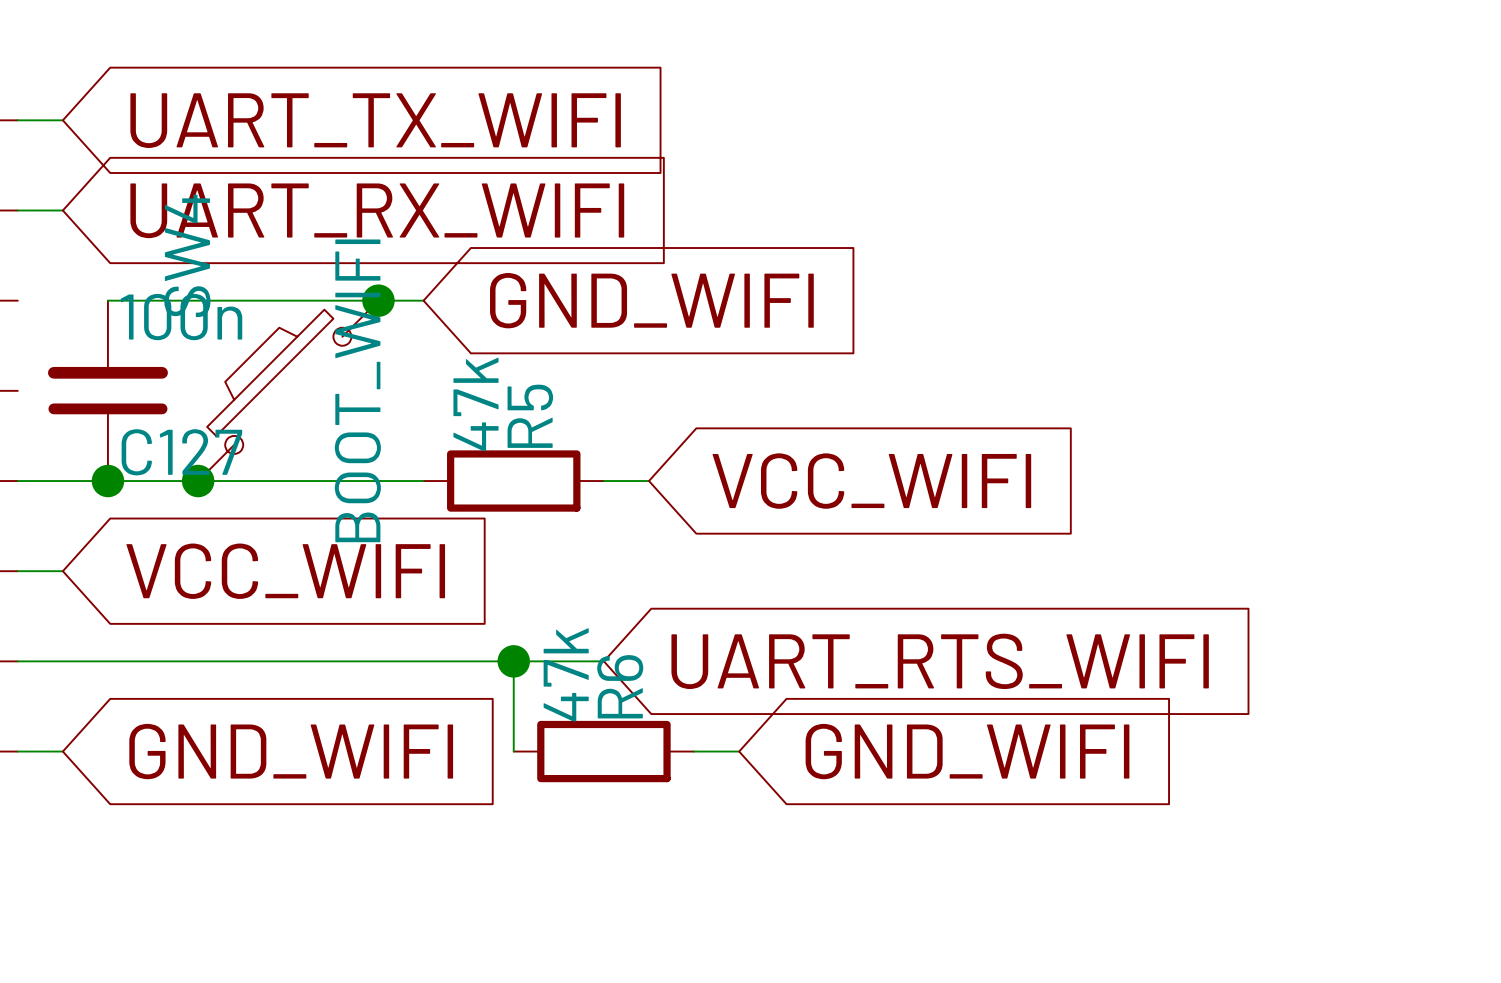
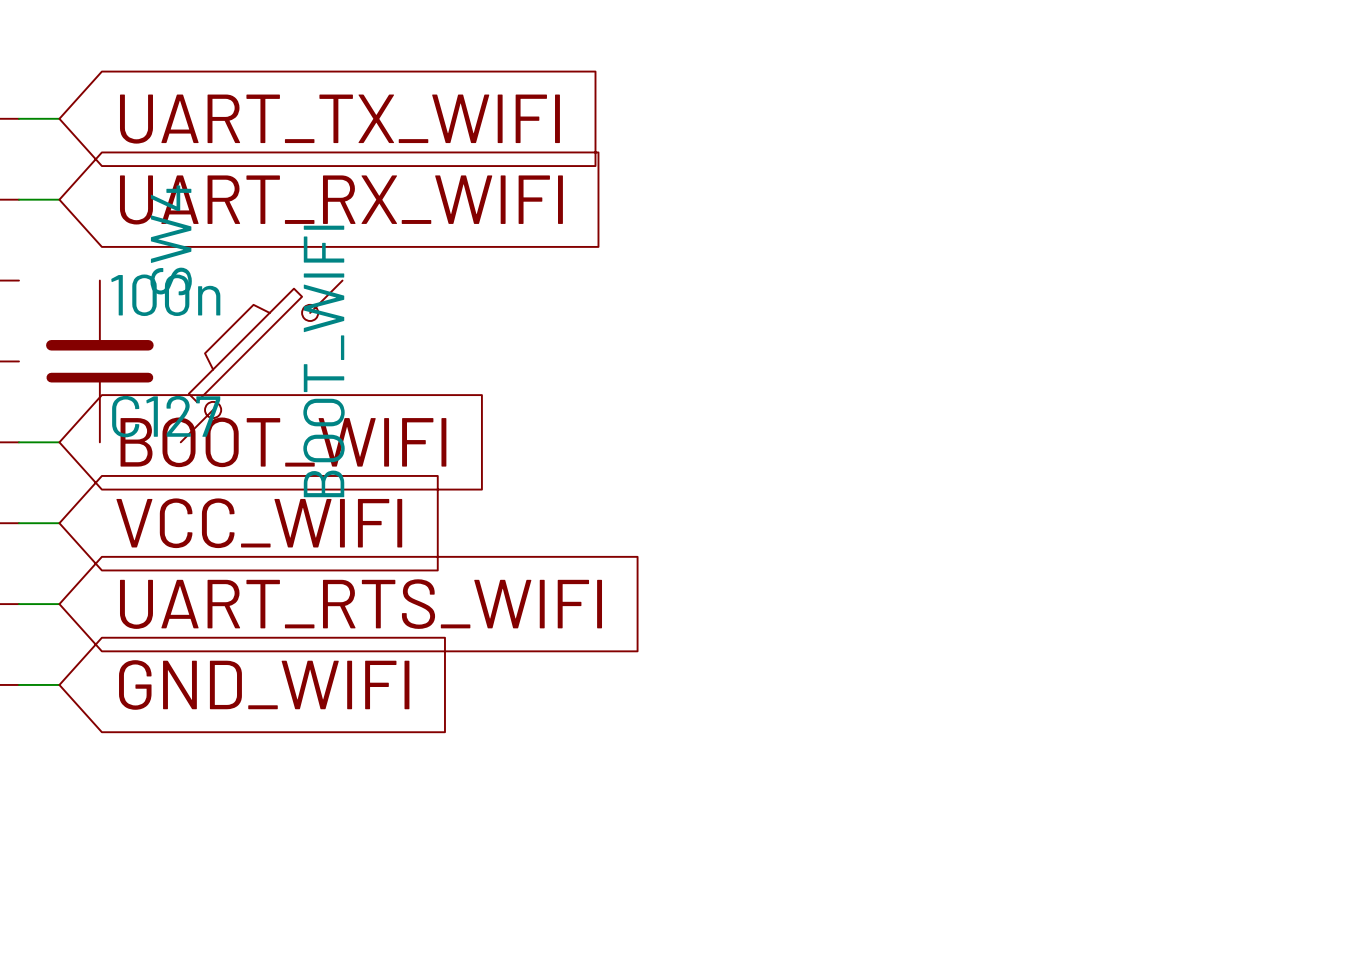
wire: (107, 300) (423, 300) -> none
junction: (378, 300) -> none
global label: GND_WIFI (651, 300) -> none
wire: (62, 481) (423, 481) -> none
junction: (107, 481) -> none
junction: (198, 481) -> none
global label: none -> BOOT_WIFI (283, 442)
R5: 47k (513, 481) -> none
wire: (603, 481) (649, 481) -> none
global label: VCC_WIFI (871, 481) -> none
wire: (62, 661) (603, 661) -> none
wire: (513, 661) (513, 751) -> none
junction: (513, 661) -> none
global label position: UART_RTS_WIFI (940, 661) -> UART_RTS_WIFI (361, 604)
R6: 47k (603, 751) -> none
wire: (694, 751) (739, 751) -> none
global label: GND_WIFI (967, 751) -> none

